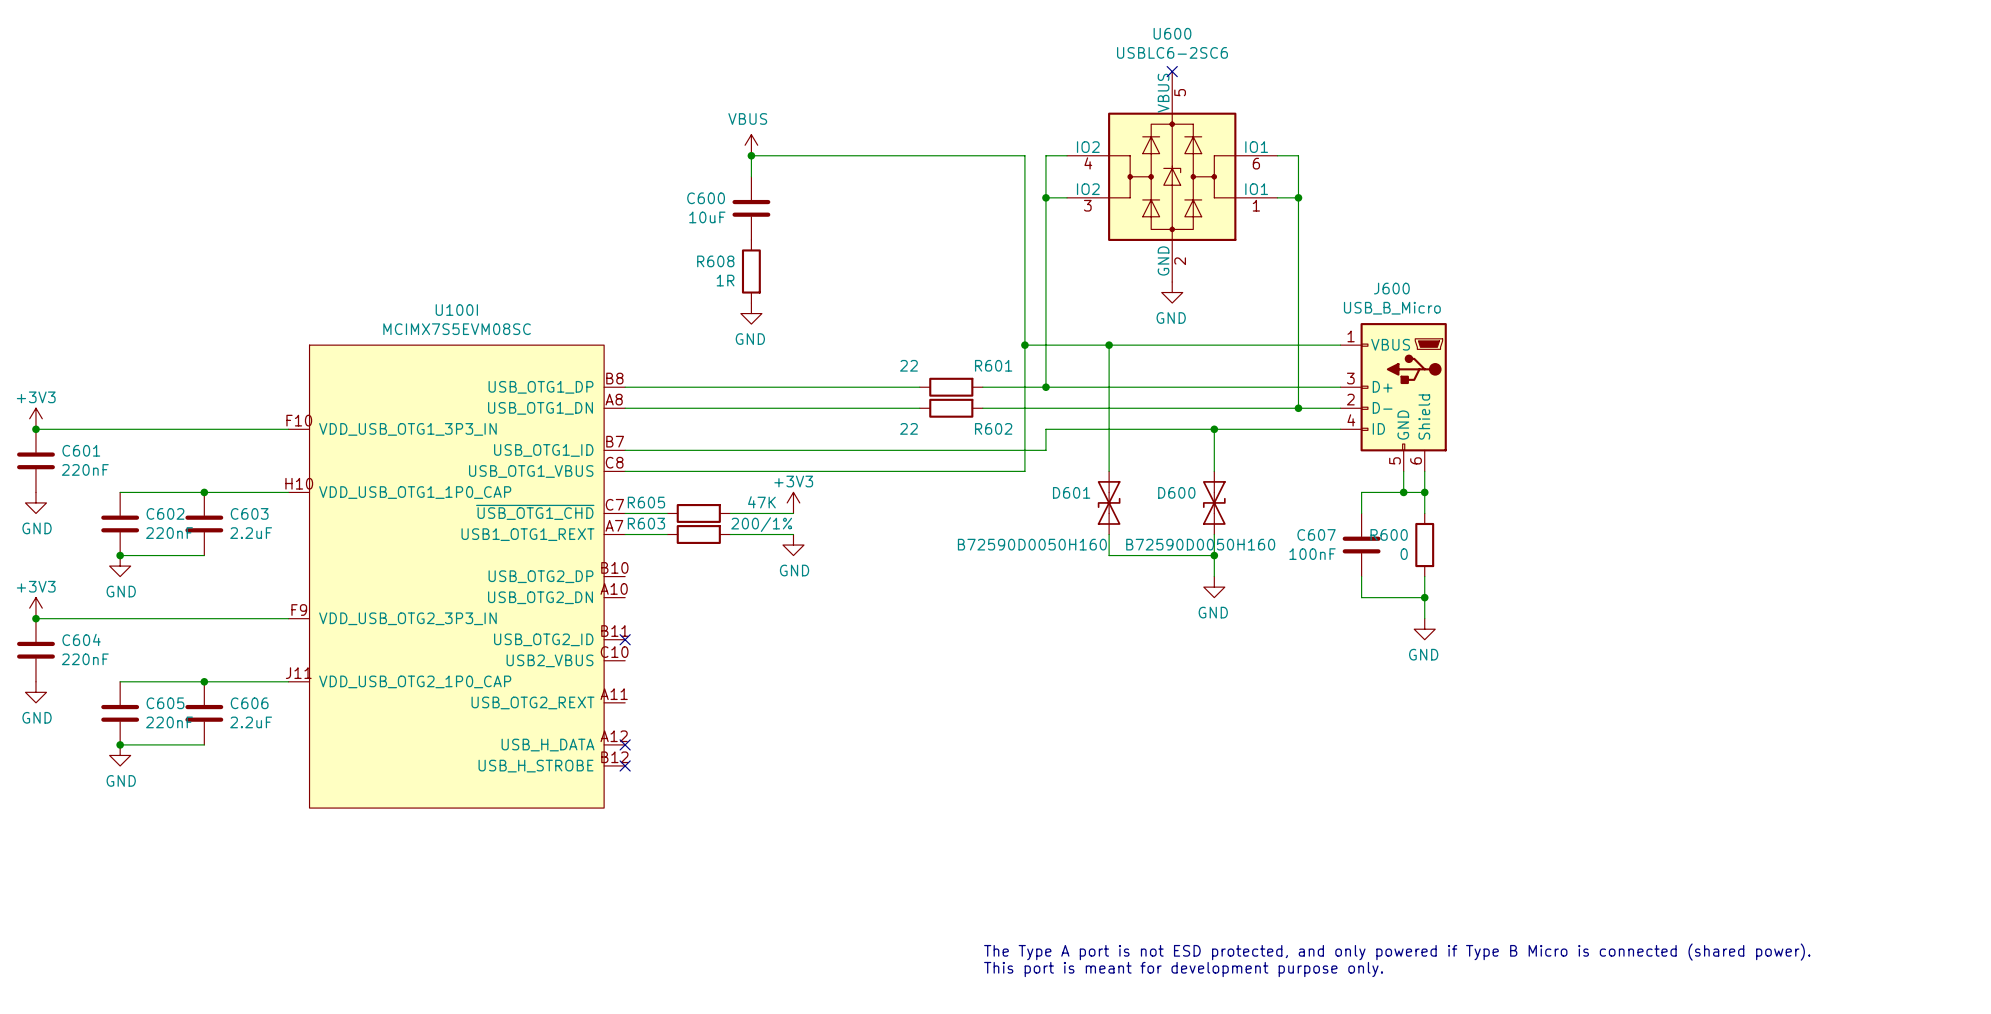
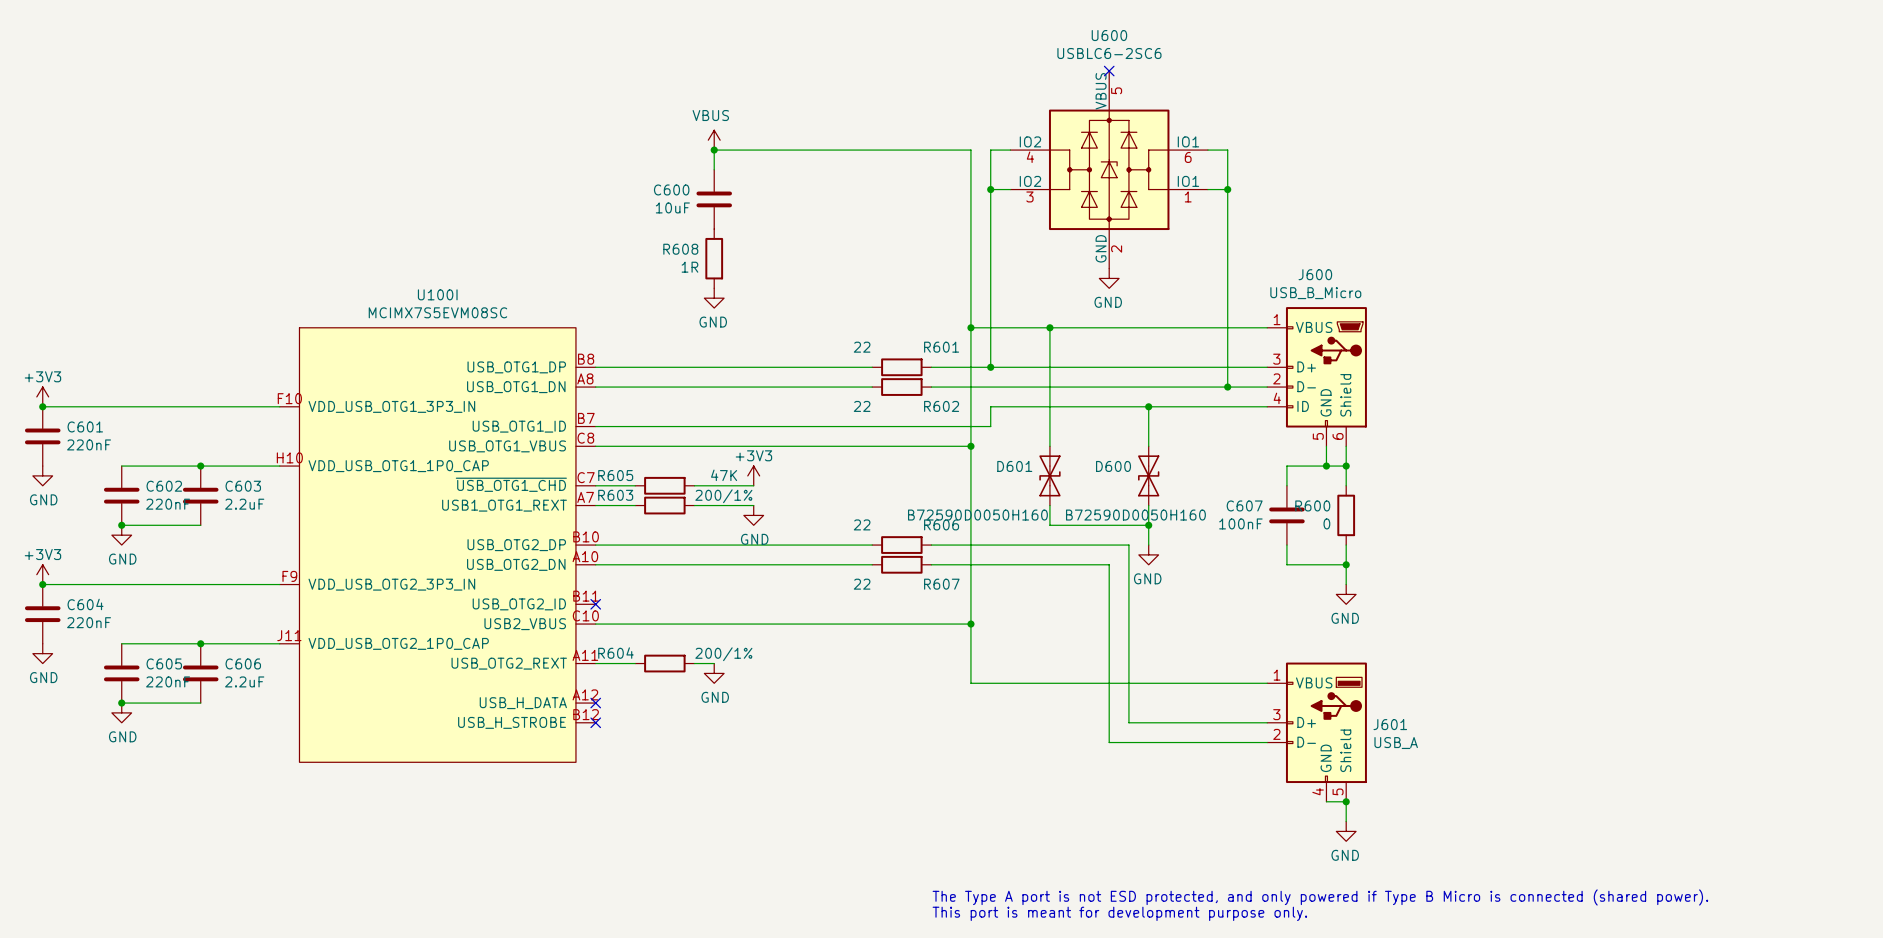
wire: none -> (970, 446) (970, 683) (1267, 683)
junction: none -> (970, 446)
wire: none -> (595, 545) (872, 545)
R606: none -> 22 (901, 545)
wire: none -> (931, 545) (1128, 545) (1128, 722) (1267, 722)
wire: none -> (595, 564) (872, 564)
R607: none -> 22 (901, 564)
wire: none -> (931, 564) (1109, 564) (1109, 742) (1267, 742)
wire: none -> (595, 624) (970, 624)
junction: none -> (970, 624)
wire: none -> (595, 663) (635, 663)
R604: none -> 200/1% (664, 663)
wire: none -> (694, 663) (714, 663)
power symbol: none -> GND (714, 673)
J601: none -> USB_A (1317, 732)
wire: none -> (1326, 801) (1346, 801) (1346, 821)
junction: none -> (1346, 801)
power symbol: none -> GND (1346, 831)

